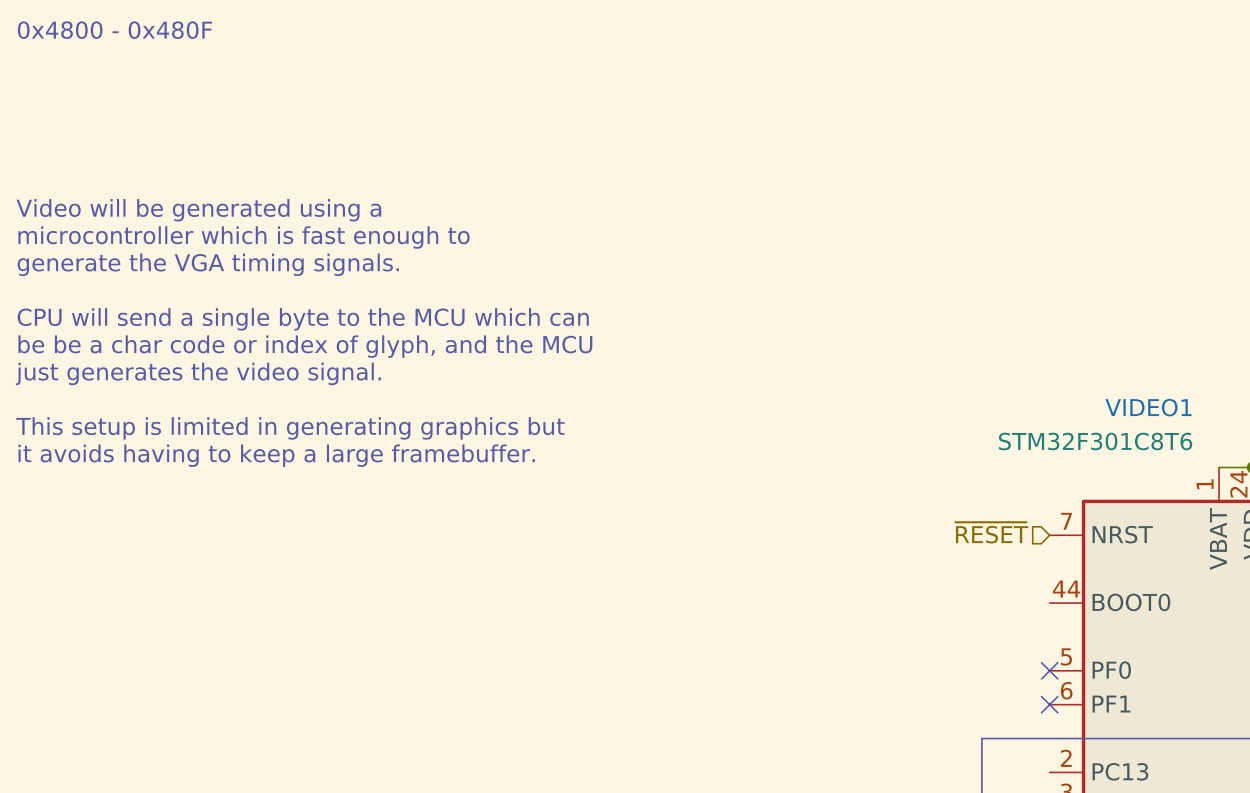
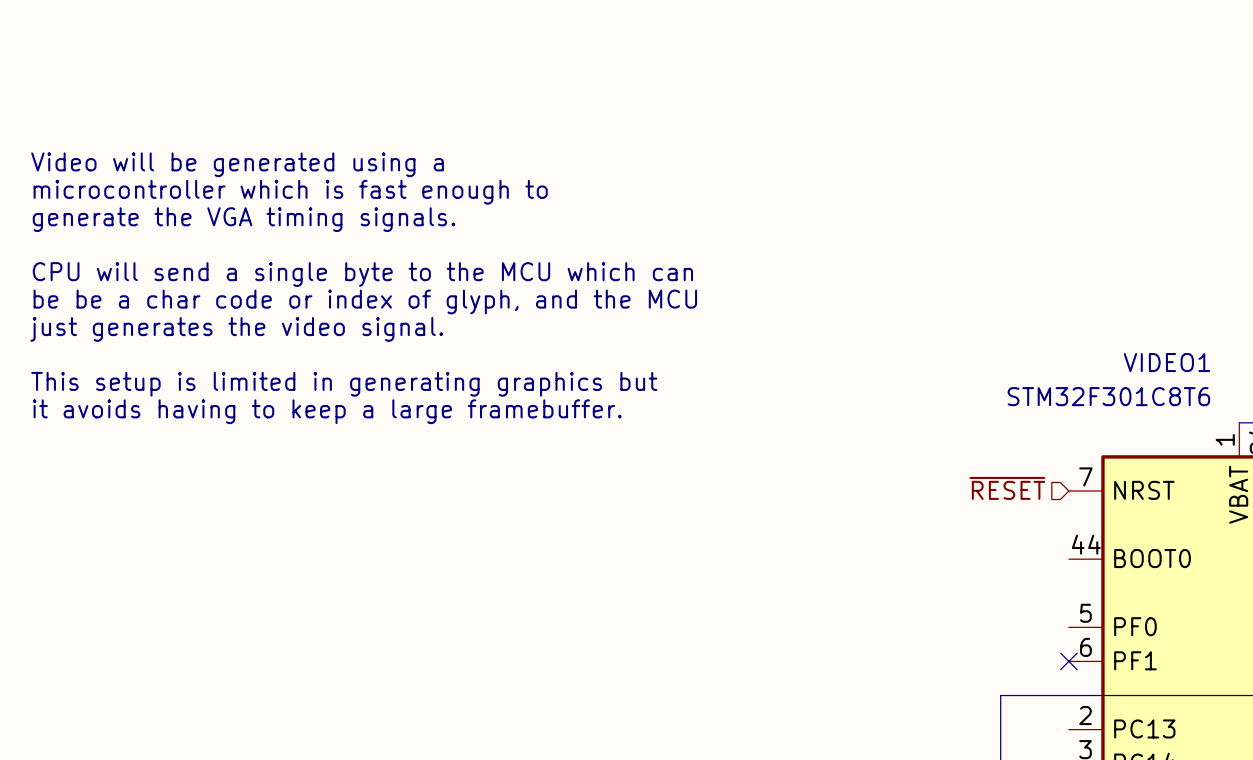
no-connect mark: (1049, 670) -> none

